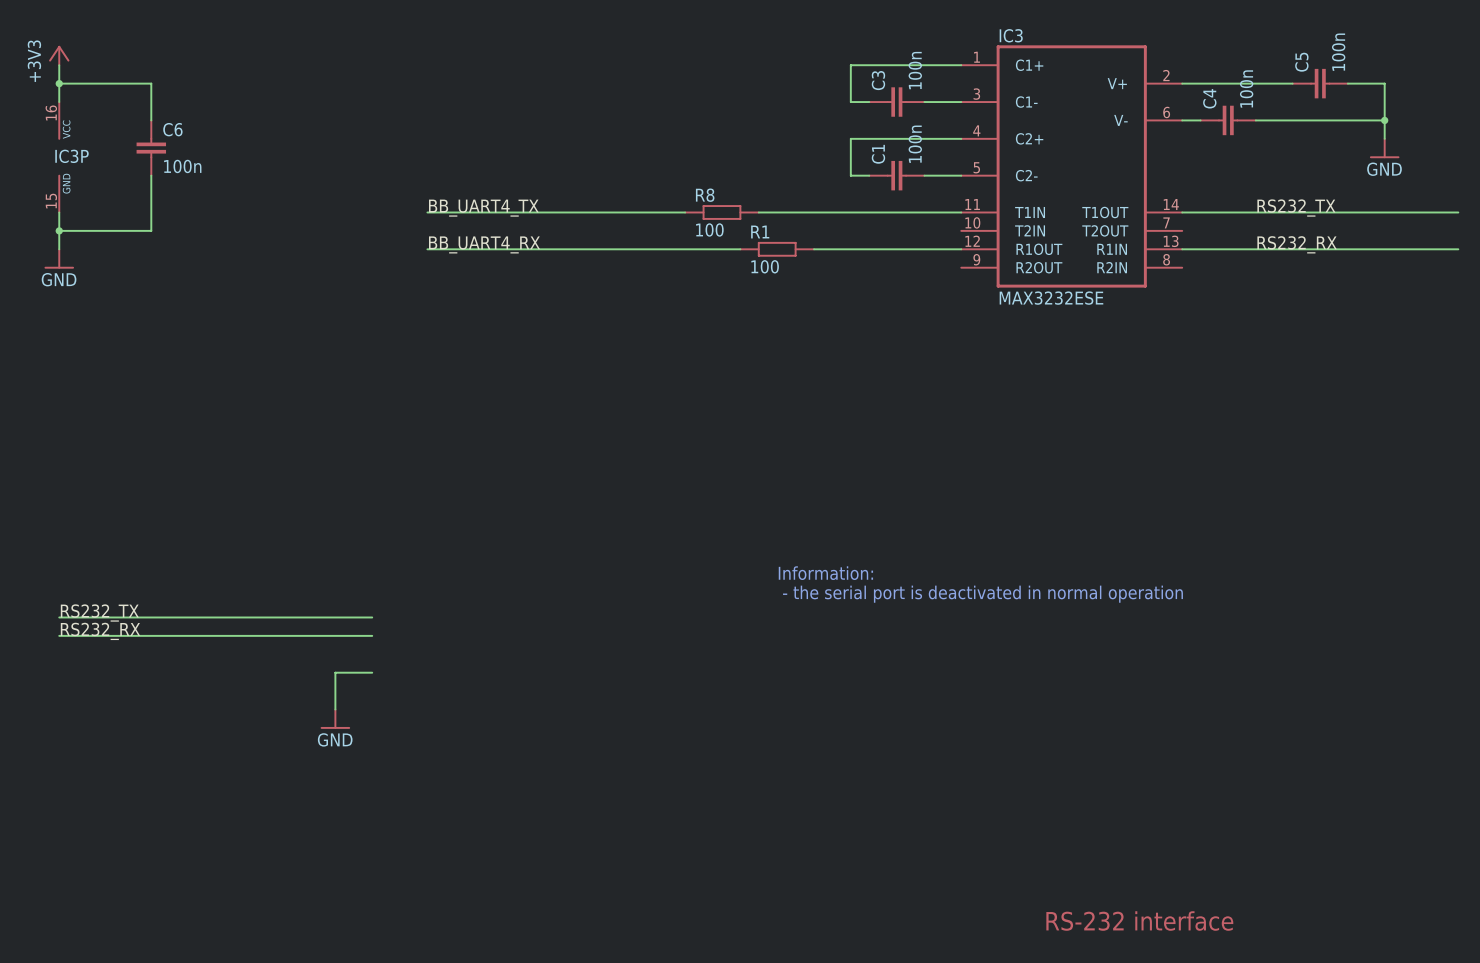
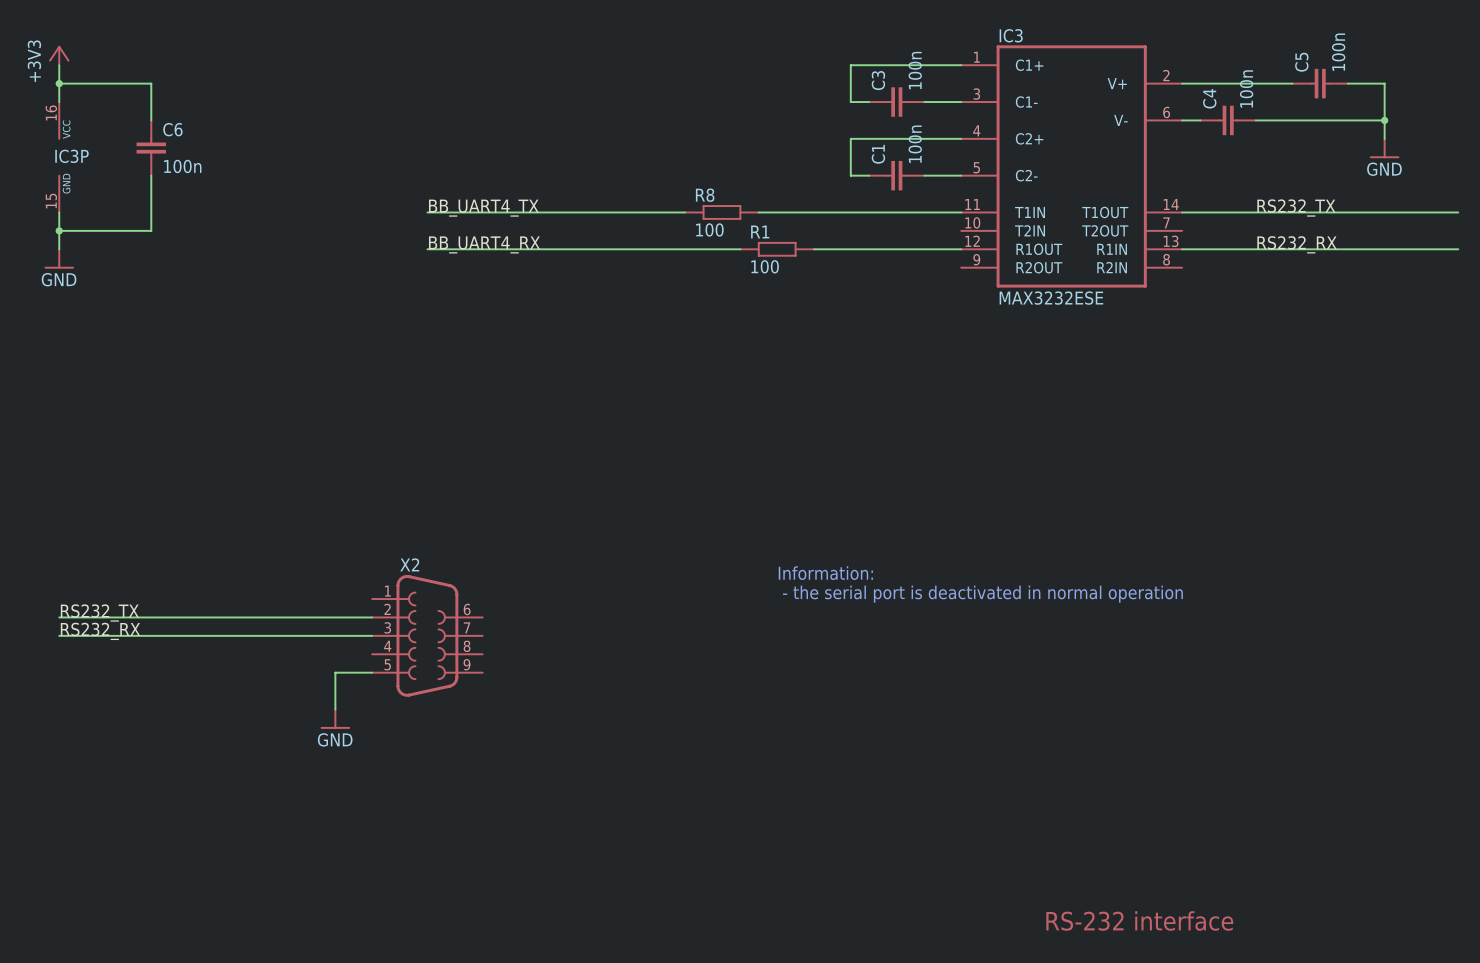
X2: none -> (427, 635)

